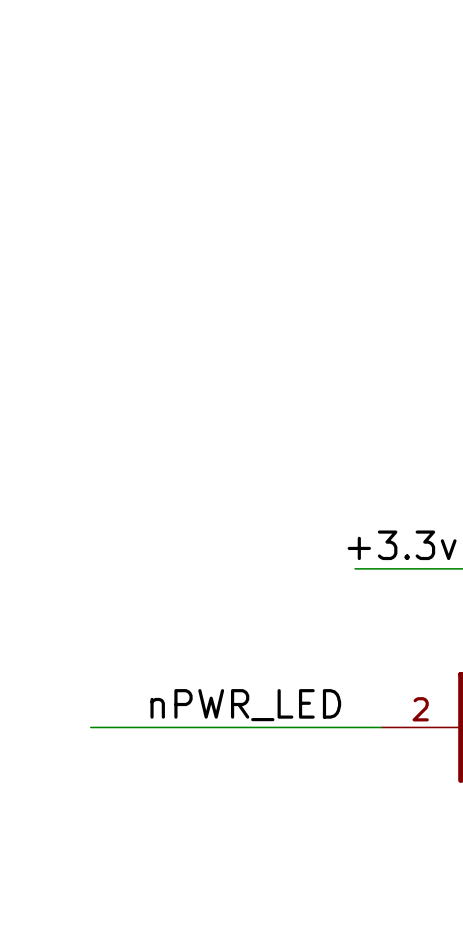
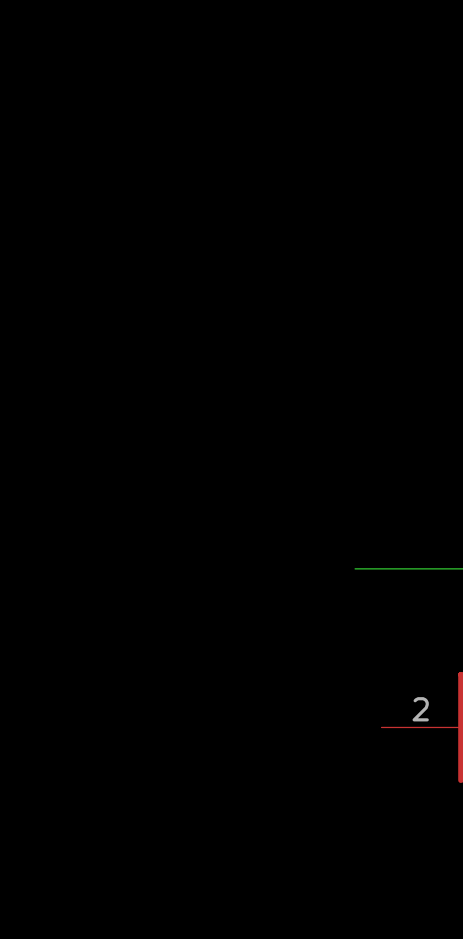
label: +3.3v (402, 545) -> none
label: nPWR_LED (245, 705) -> none
wire: (90, 727) (381, 727) -> none

